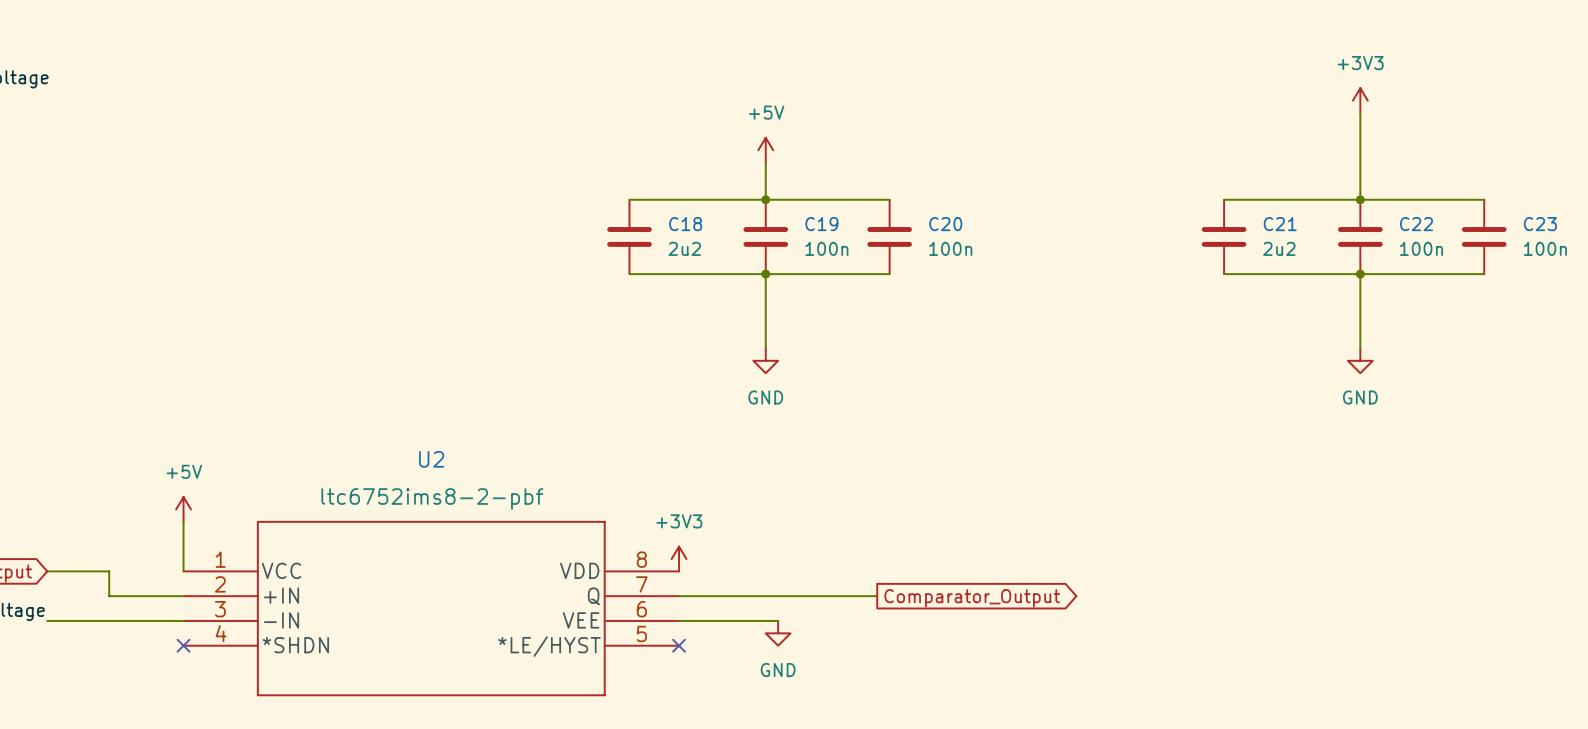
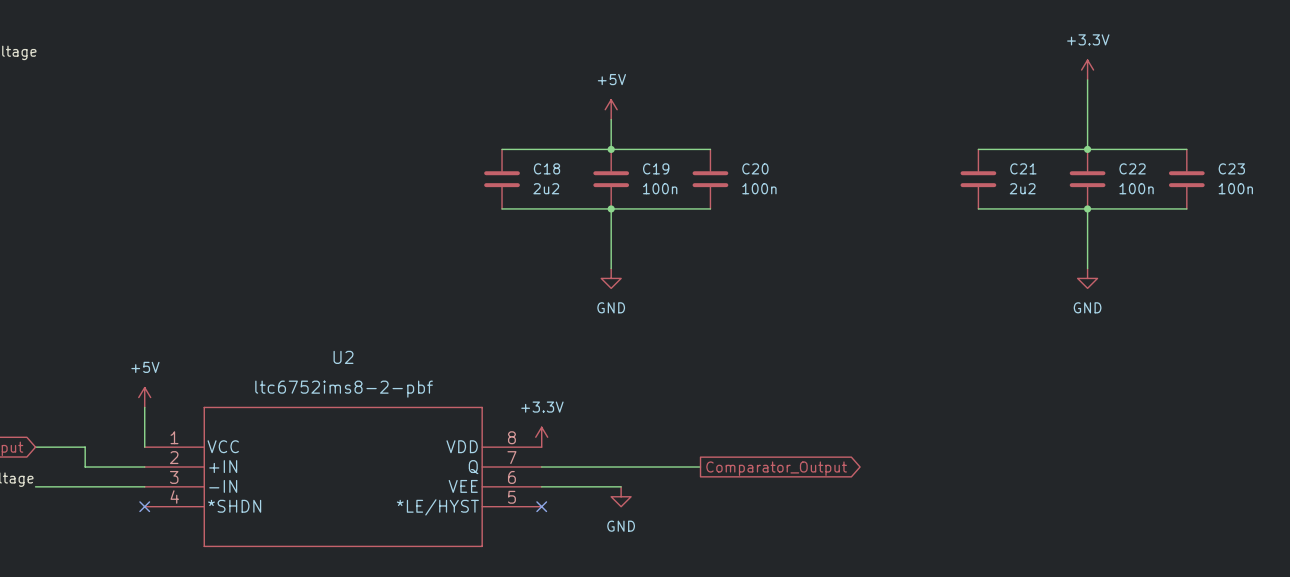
power symbol: +3V3 (1360, 100) -> +3.3V (1087, 70)
power symbol: +3V3 (679, 559) -> +3.3V (541, 437)

